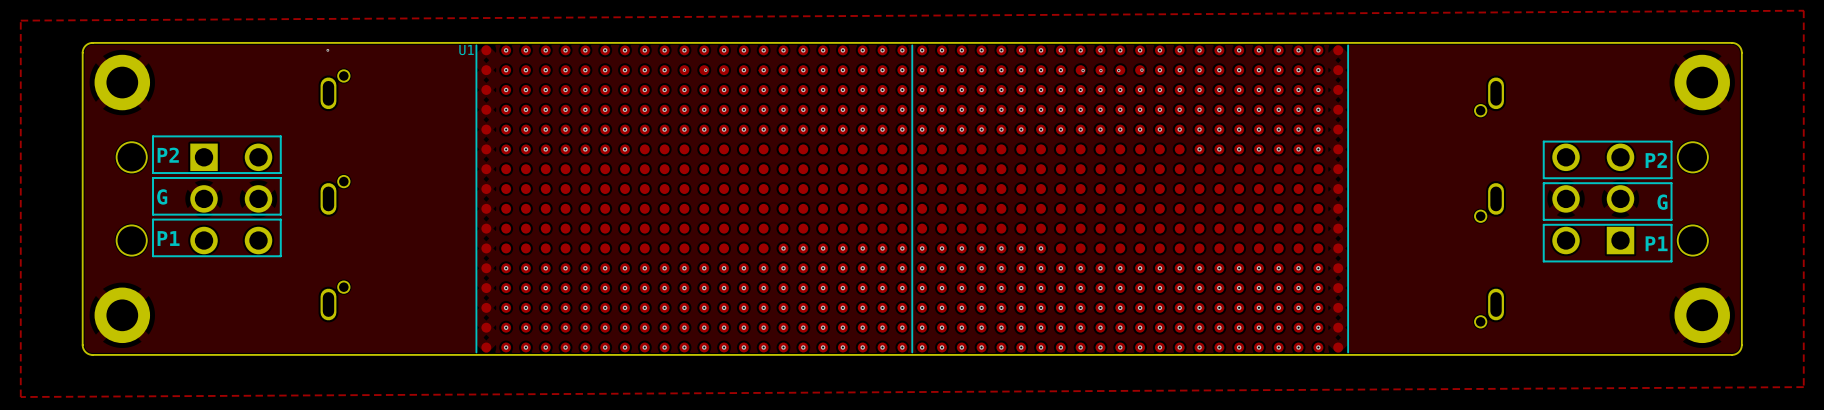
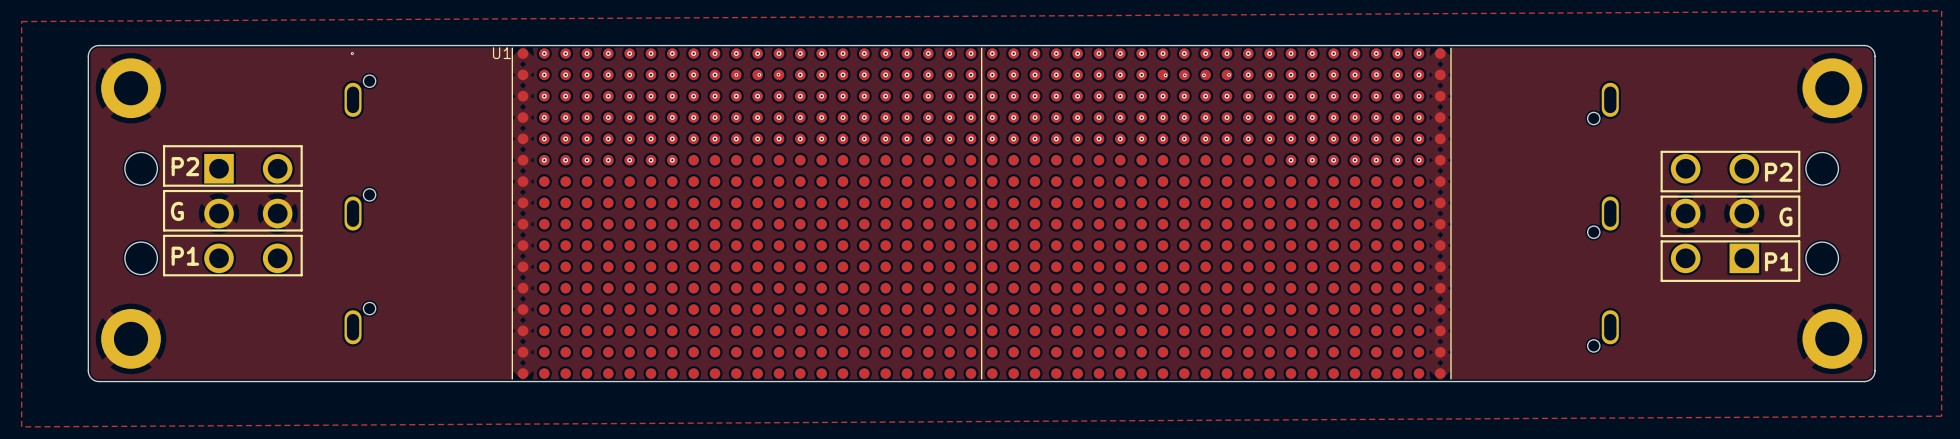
via: (783, 248) -> none
via: (803, 248) -> none
via: (823, 248) -> none
via: (842, 248) -> none
via: (862, 248) -> none
via: (882, 248) -> none
via: (902, 248) -> none
via: (922, 248) -> none
via: (941, 248) -> none
via: (961, 248) -> none
via: (981, 248) -> none
via: (1001, 248) -> none
via: (1021, 248) -> none
via: (1041, 248) -> none
via: (506, 268) -> none
via: (525, 268) -> none
via: (545, 268) -> none
via: (565, 268) -> none
via: (585, 268) -> none
via: (605, 268) -> none
via: (625, 268) -> none
via: (644, 268) -> none
via: (664, 268) -> none
via: (684, 268) -> none
via: (704, 268) -> none
via: (724, 268) -> none
via: (743, 268) -> none
via: (763, 268) -> none
via: (783, 268) -> none
via: (803, 268) -> none
via: (823, 268) -> none
via: (842, 268) -> none
via: (862, 268) -> none
via: (882, 268) -> none
via: (902, 268) -> none
via: (922, 268) -> none
via: (941, 268) -> none
via: (961, 268) -> none
via: (981, 268) -> none
via: (1001, 268) -> none
via: (1021, 268) -> none
via: (1041, 268) -> none
via: (1060, 268) -> none
via: (1080, 268) -> none
via: (1100, 268) -> none
via: (1120, 268) -> none
via: (1140, 268) -> none
via: (1159, 268) -> none
via: (1179, 268) -> none
via: (1199, 268) -> none
via: (1219, 268) -> none
via: (1239, 268) -> none
via: (1258, 268) -> none
via: (1278, 268) -> none
via: (1298, 268) -> none
via: (1318, 268) -> none
via: (506, 288) -> none
via: (525, 288) -> none
via: (545, 288) -> none
via: (565, 288) -> none
via: (585, 288) -> none
via: (605, 288) -> none
via: (625, 288) -> none
via: (644, 288) -> none
via: (664, 288) -> none
via: (684, 288) -> none
via: (704, 288) -> none
via: (724, 288) -> none
via: (743, 288) -> none
via: (763, 288) -> none
via: (783, 288) -> none
via: (803, 288) -> none
via: (823, 288) -> none
via: (842, 288) -> none
via: (862, 288) -> none
via: (882, 288) -> none
via: (902, 288) -> none
via: (922, 288) -> none
via: (941, 288) -> none
via: (961, 288) -> none
via: (981, 288) -> none
via: (1001, 288) -> none
via: (1021, 288) -> none
via: (1041, 288) -> none
via: (1060, 288) -> none
via: (1080, 288) -> none
via: (1100, 288) -> none
via: (1120, 288) -> none
via: (1140, 288) -> none
via: (1159, 288) -> none
via: (1179, 288) -> none
via: (1199, 288) -> none
via: (1219, 288) -> none
via: (1239, 288) -> none
via: (1258, 288) -> none
via: (1278, 288) -> none
via: (1298, 288) -> none
via: (1318, 288) -> none
via: (506, 307) -> none
via: (525, 307) -> none
via: (545, 307) -> none
via: (565, 307) -> none
via: (585, 307) -> none
via: (605, 307) -> none
via: (625, 307) -> none
via: (644, 307) -> none
via: (664, 307) -> none
via: (684, 307) -> none
via: (704, 307) -> none
via: (724, 307) -> none
via: (743, 307) -> none
via: (763, 307) -> none
via: (783, 307) -> none
via: (803, 307) -> none
via: (823, 307) -> none
via: (842, 307) -> none
via: (862, 307) -> none
via: (882, 307) -> none
via: (902, 307) -> none
via: (922, 307) -> none
via: (941, 307) -> none
via: (961, 307) -> none
via: (981, 307) -> none
via: (1001, 307) -> none
via: (1021, 307) -> none
via: (1041, 307) -> none
via: (1060, 307) -> none
via: (1080, 307) -> none
via: (1100, 307) -> none
via: (1120, 307) -> none
via: (1140, 307) -> none
via: (1159, 307) -> none
via: (1179, 307) -> none
via: (1199, 307) -> none
via: (1219, 307) -> none
via: (1239, 307) -> none
via: (1258, 307) -> none
via: (1278, 307) -> none
via: (1298, 307) -> none
via: (1318, 307) -> none
via: (506, 327) -> none
via: (525, 327) -> none
via: (545, 327) -> none
via: (565, 327) -> none
via: (585, 327) -> none
via: (605, 327) -> none
via: (625, 327) -> none
via: (644, 327) -> none
via: (664, 327) -> none
via: (684, 327) -> none
via: (704, 327) -> none
via: (724, 327) -> none
via: (743, 327) -> none
via: (763, 327) -> none
via: (783, 327) -> none
via: (803, 327) -> none
via: (823, 327) -> none
via: (842, 327) -> none
via: (862, 327) -> none
via: (882, 327) -> none
via: (902, 327) -> none
via: (922, 327) -> none
via: (941, 327) -> none
via: (961, 327) -> none
via: (981, 327) -> none
via: (1001, 327) -> none
via: (1021, 327) -> none
via: (1041, 327) -> none
via: (1060, 327) -> none
via: (1080, 327) -> none
via: (1100, 327) -> none
via: (1120, 327) -> none
via: (1140, 327) -> none
via: (1159, 327) -> none
via: (1179, 327) -> none
via: (1199, 327) -> none
via: (1219, 327) -> none
via: (1239, 327) -> none
via: (1258, 327) -> none
via: (1278, 327) -> none
via: (1298, 327) -> none
via: (1318, 327) -> none
via: (506, 347) -> none
via: (525, 347) -> none
via: (545, 347) -> none
via: (565, 347) -> none
via: (585, 347) -> none
via: (605, 347) -> none
via: (625, 347) -> none
via: (644, 347) -> none
via: (664, 347) -> none
via: (684, 347) -> none
via: (704, 347) -> none
via: (724, 347) -> none
via: (743, 347) -> none
via: (763, 347) -> none
via: (783, 347) -> none
via: (803, 347) -> none
via: (823, 347) -> none
via: (842, 347) -> none
via: (862, 347) -> none
via: (882, 347) -> none
via: (902, 347) -> none
via: (922, 347) -> none
via: (941, 347) -> none
via: (961, 347) -> none
via: (981, 347) -> none
via: (1001, 347) -> none
via: (1021, 347) -> none
via: (1041, 347) -> none
via: (1060, 347) -> none
via: (1080, 347) -> none
via: (1100, 347) -> none
via: (1120, 347) -> none
via: (1140, 347) -> none
via: (1159, 347) -> none
via: (1179, 347) -> none
via: (1199, 347) -> none
via: (1219, 347) -> none
via: (1239, 347) -> none
via: (1258, 347) -> none
via: (1278, 347) -> none
via: (1298, 347) -> none
via: (1318, 347) -> none

